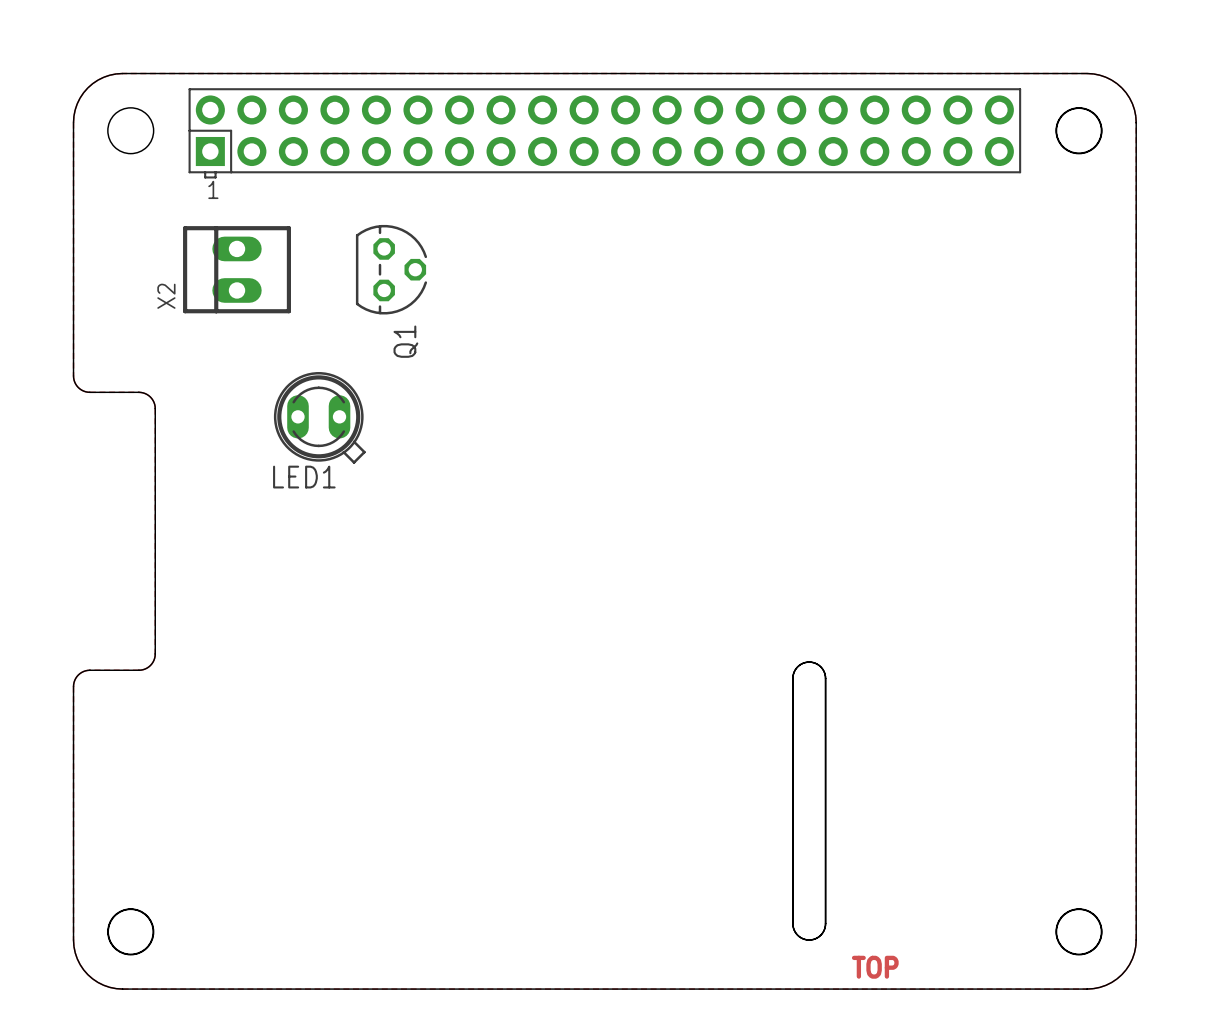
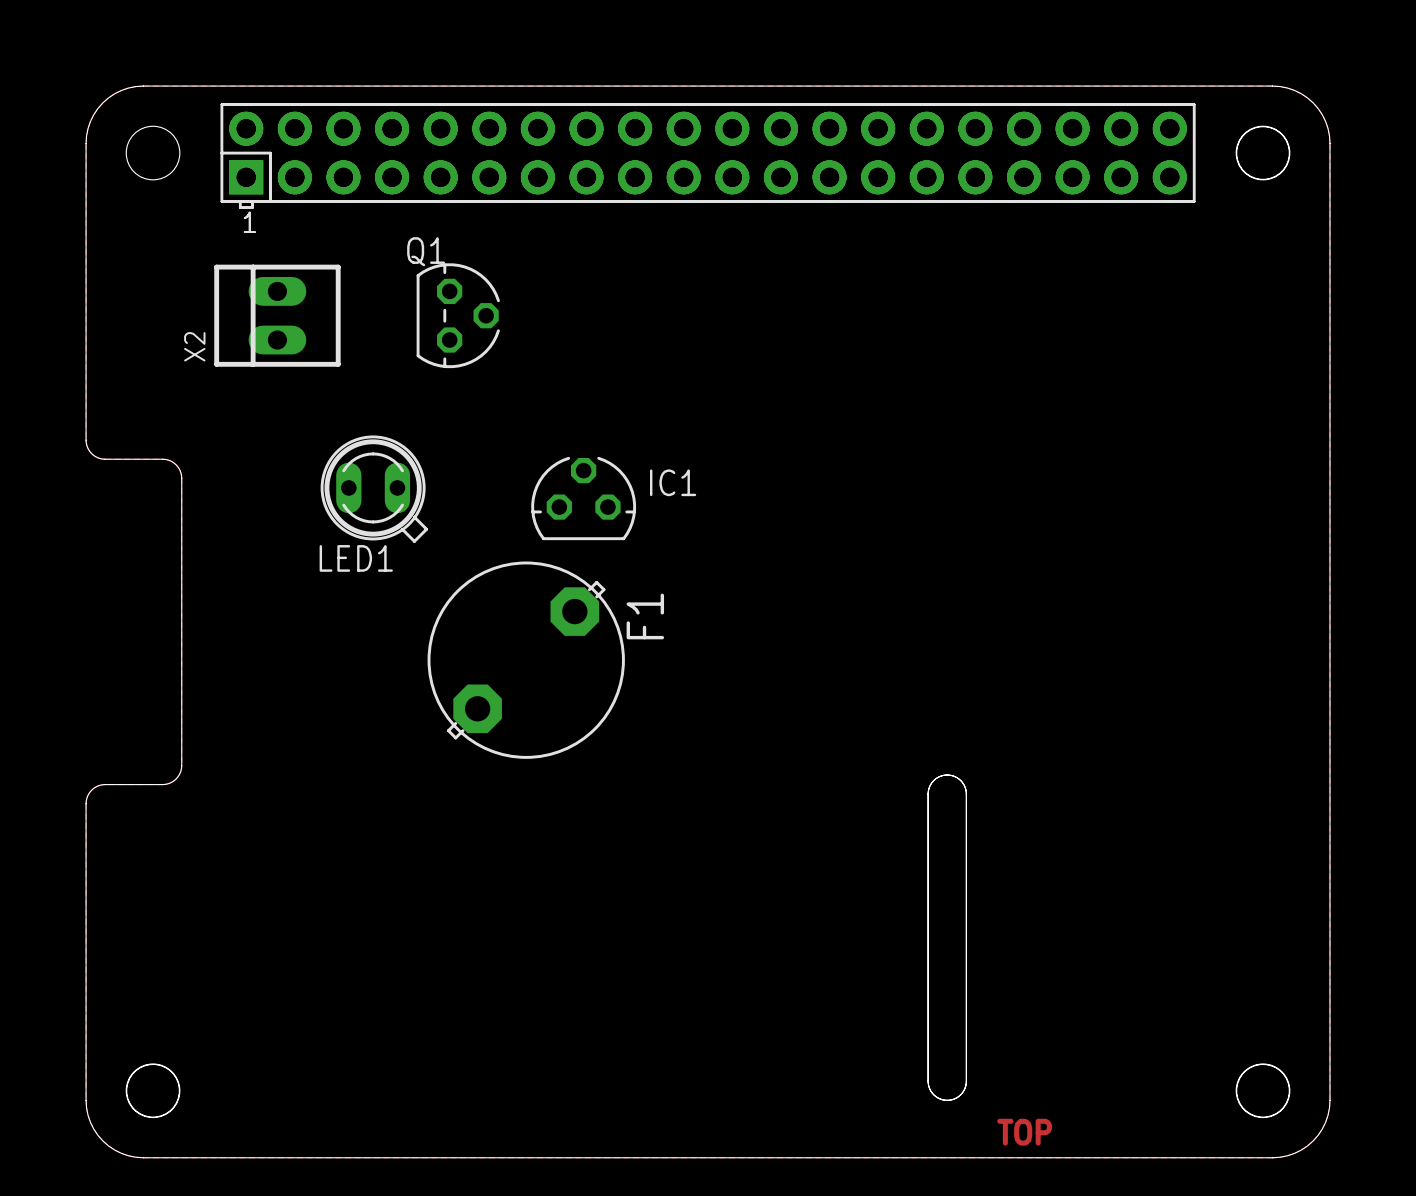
part: none -> (708, 156)
Q1 name rotation: 0° (405, 341) -> 90° clockwise (426, 251)
Q1 name position: Q1 (405, 341) -> Q1 (426, 251)
IC1: none -> (583, 498)
F1: none -> (526, 660)

